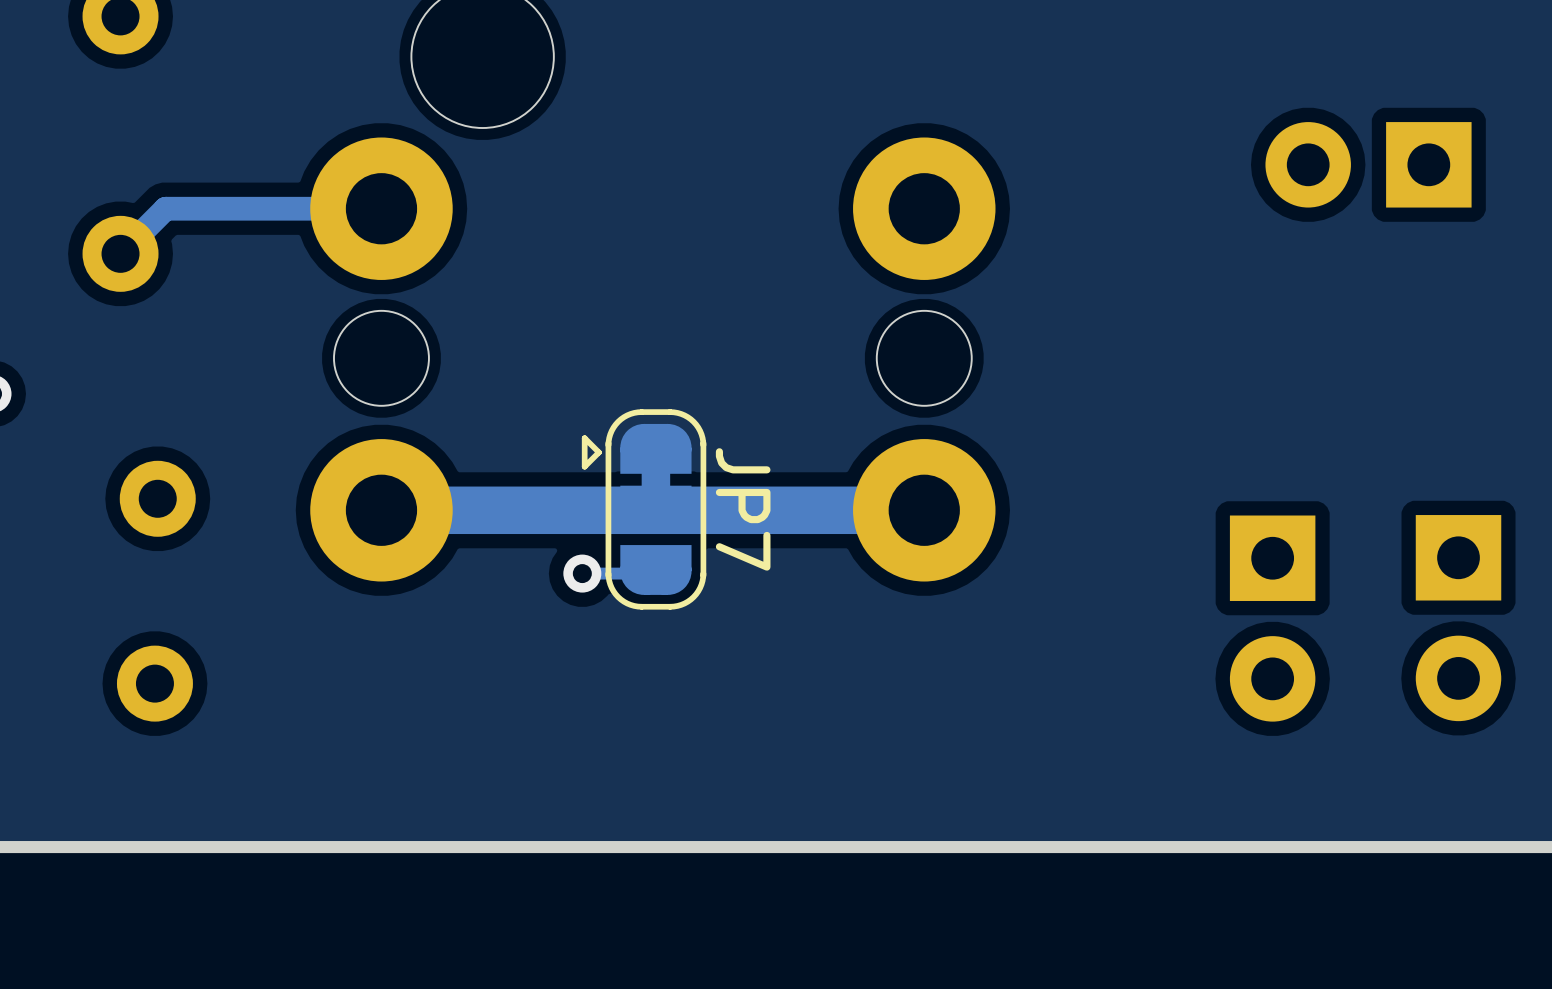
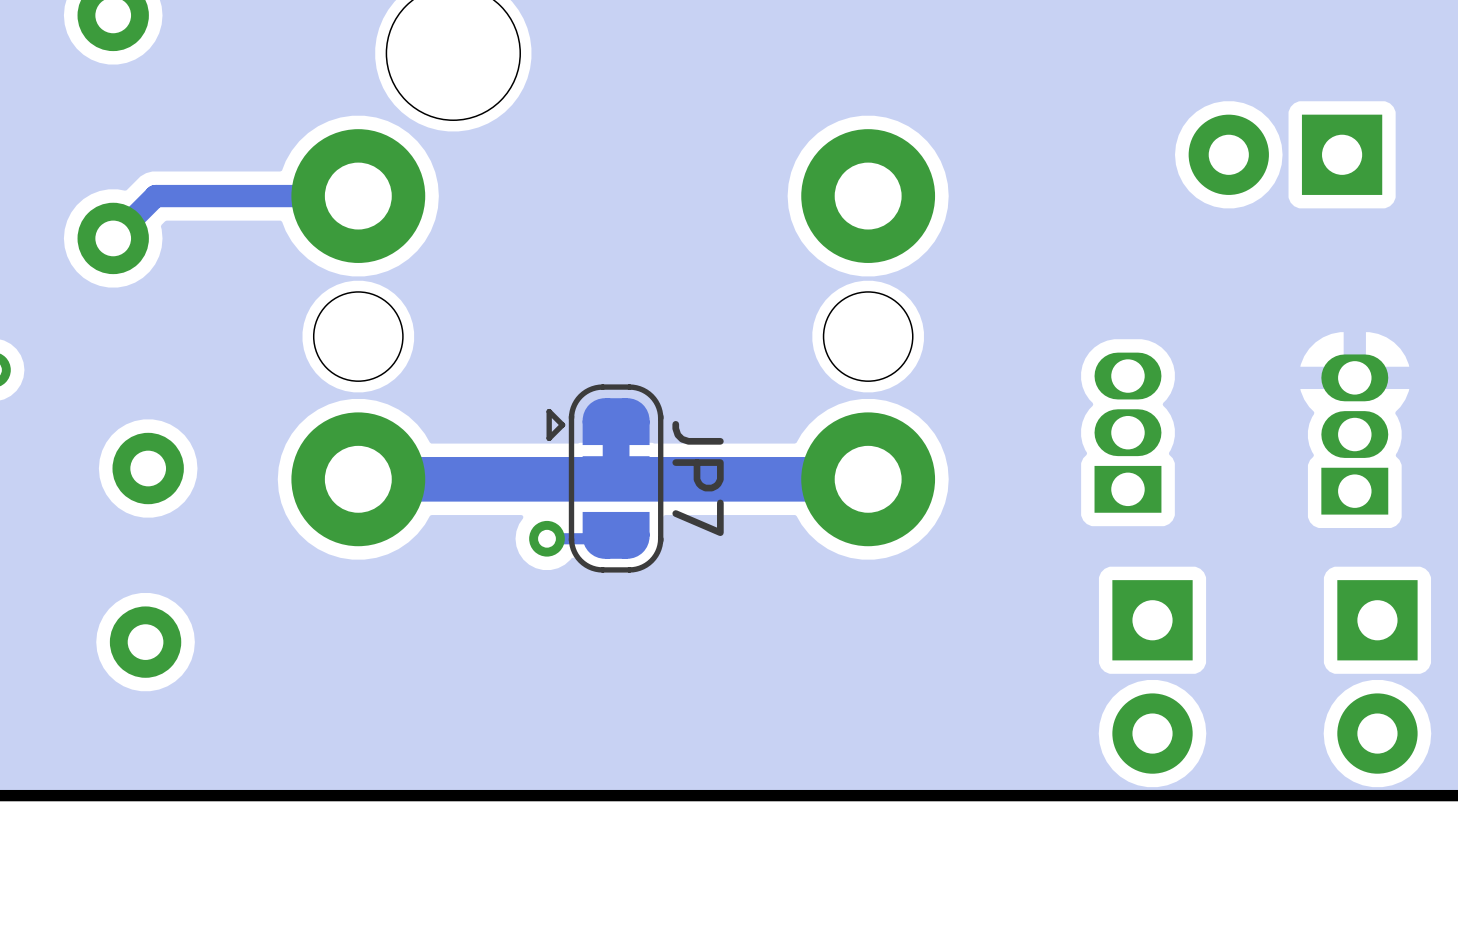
part: none -> (1127, 432)
part: none -> (1354, 434)
part: (1272, 618) -> none
part position: (1458, 618) -> (1377, 676)
part: none -> (1152, 676)

